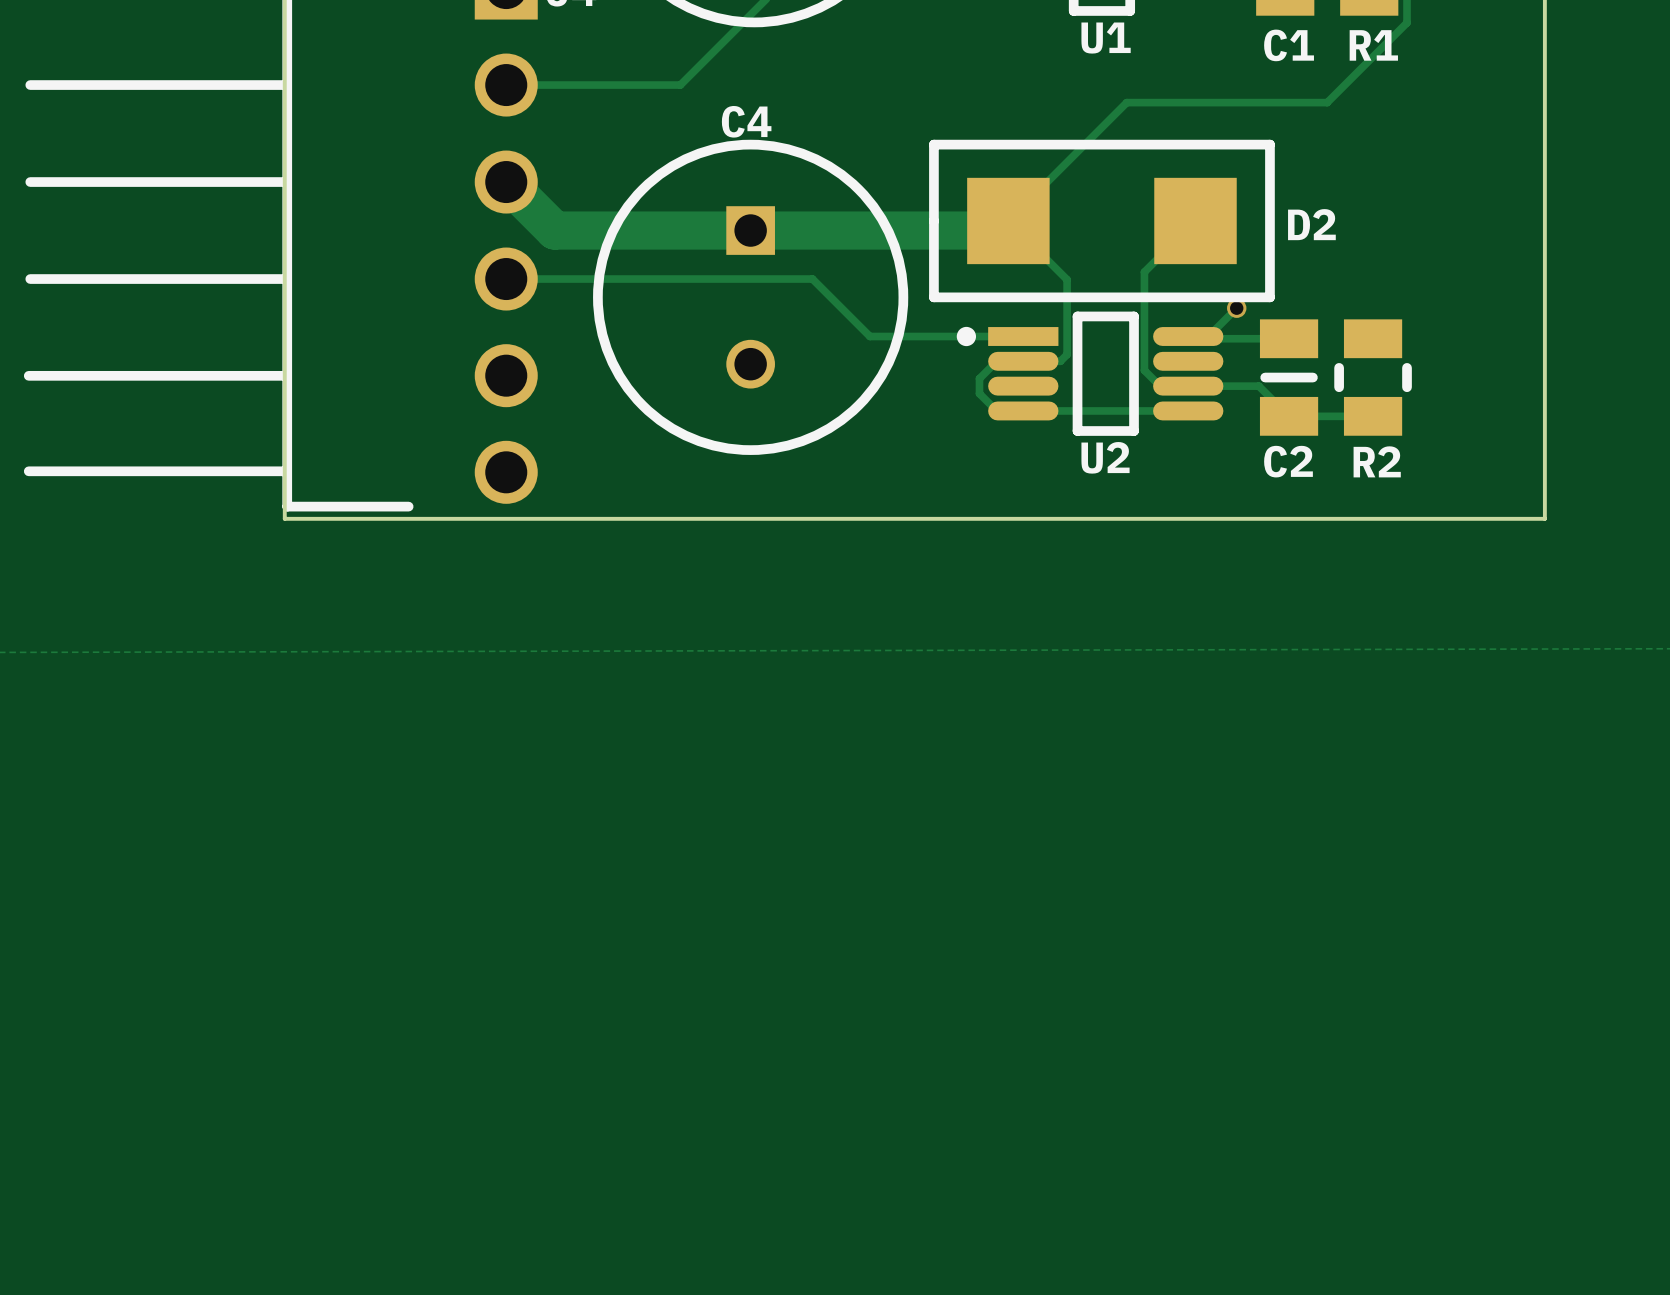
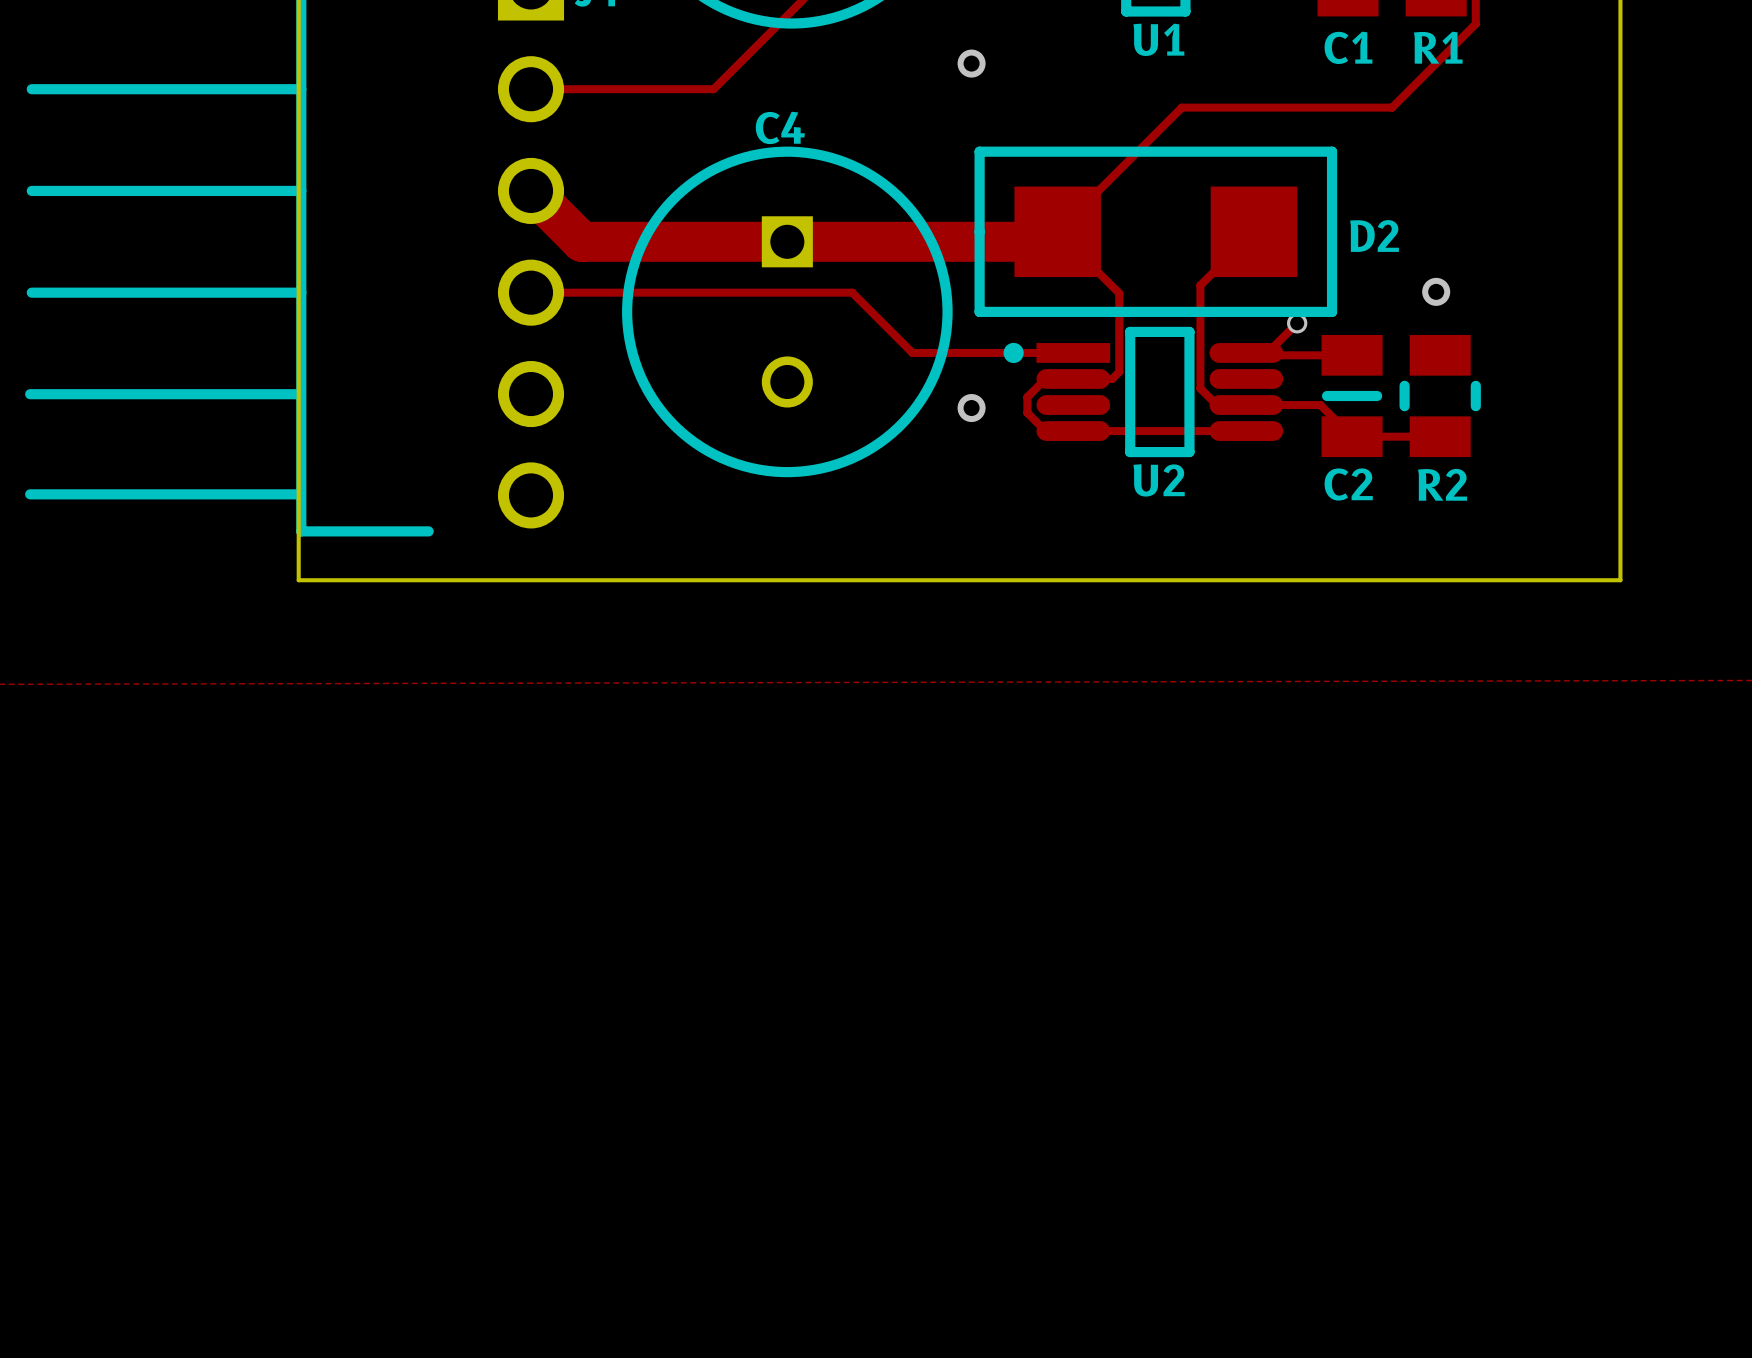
via: none -> (971, 63)
via: none -> (1436, 291)
via: none -> (971, 408)
board edge: (284, 518) (1544, 518) -> (298, 544) (298, 580) (1620, 580) (1620, 544)

